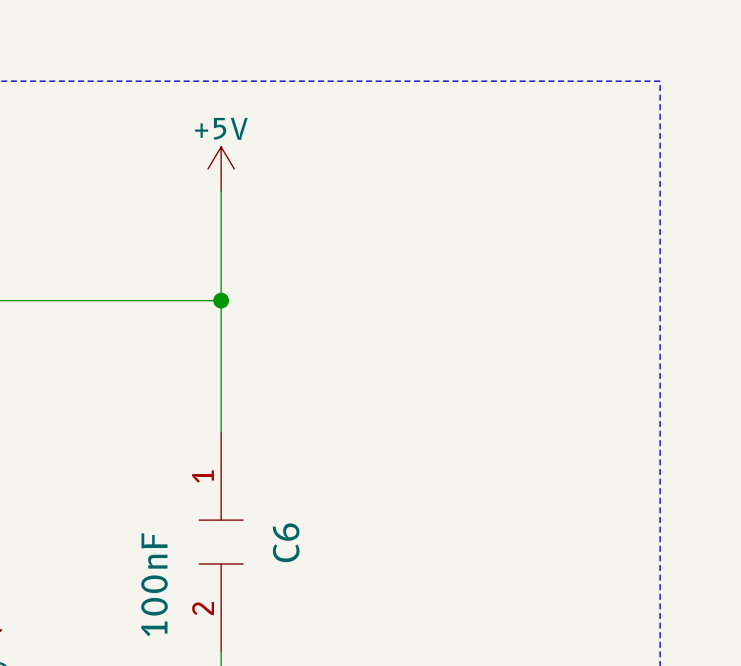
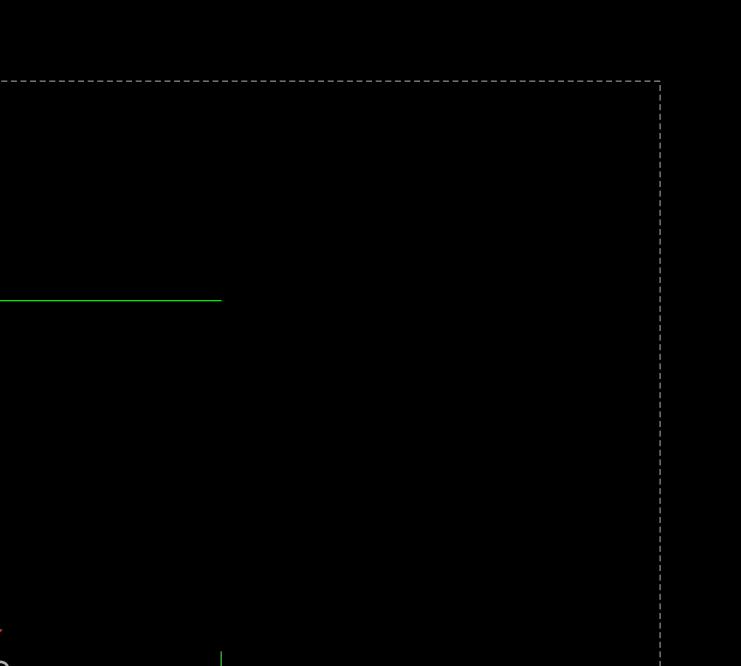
power symbol: +5V (221, 168) -> none
wire: (221, 190) (221, 432) -> none
junction: (221, 300) -> none
C6: 100nF (221, 542) -> none

